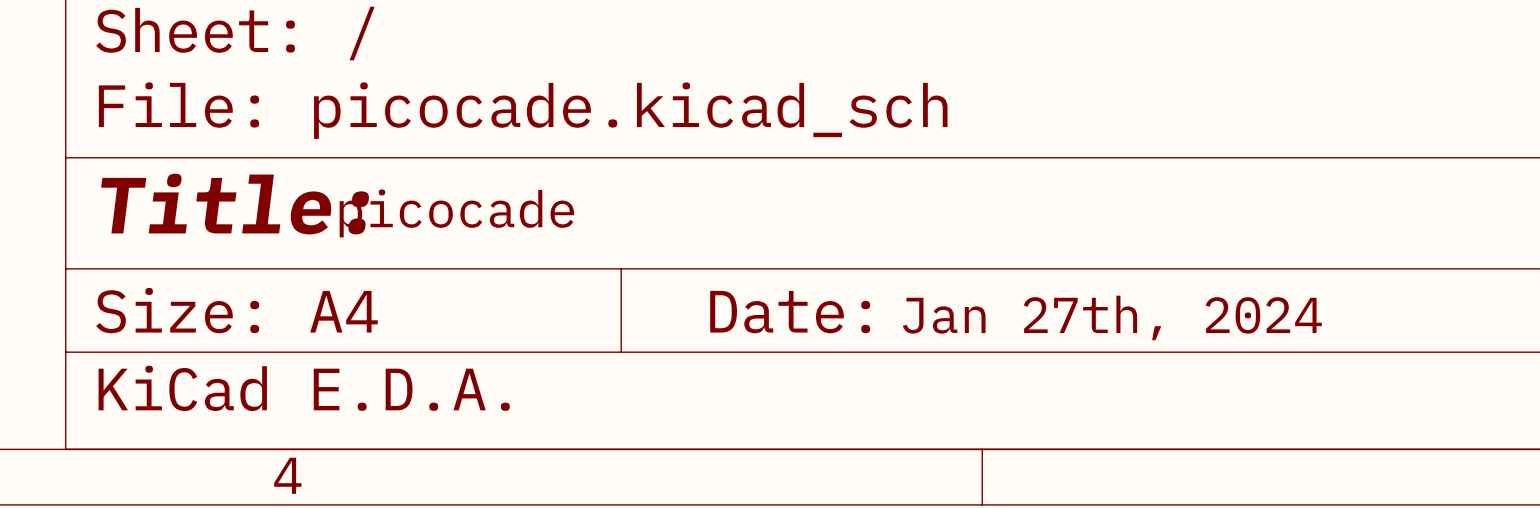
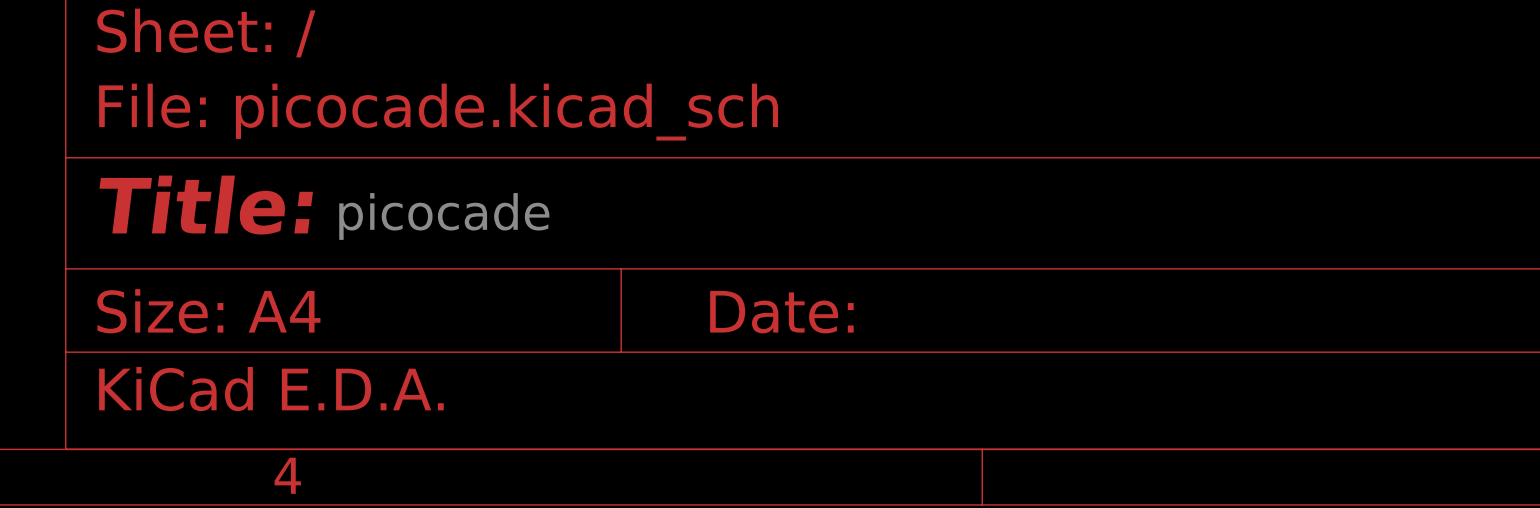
label: picocade (456, 213) -> none
text: none -> picocade (444, 216)
label: Jan 27th, 2024 (1112, 317) -> none

